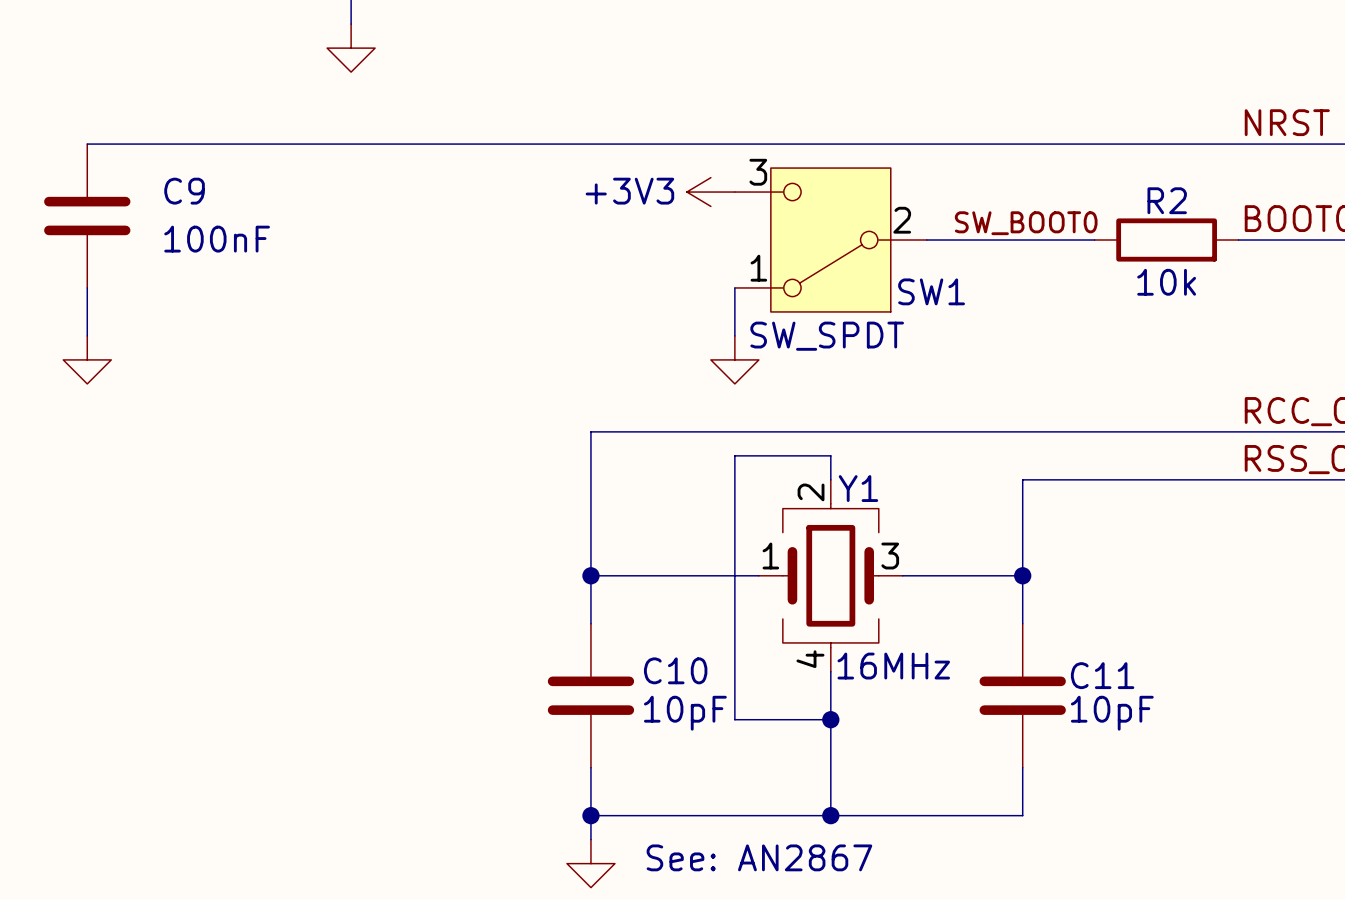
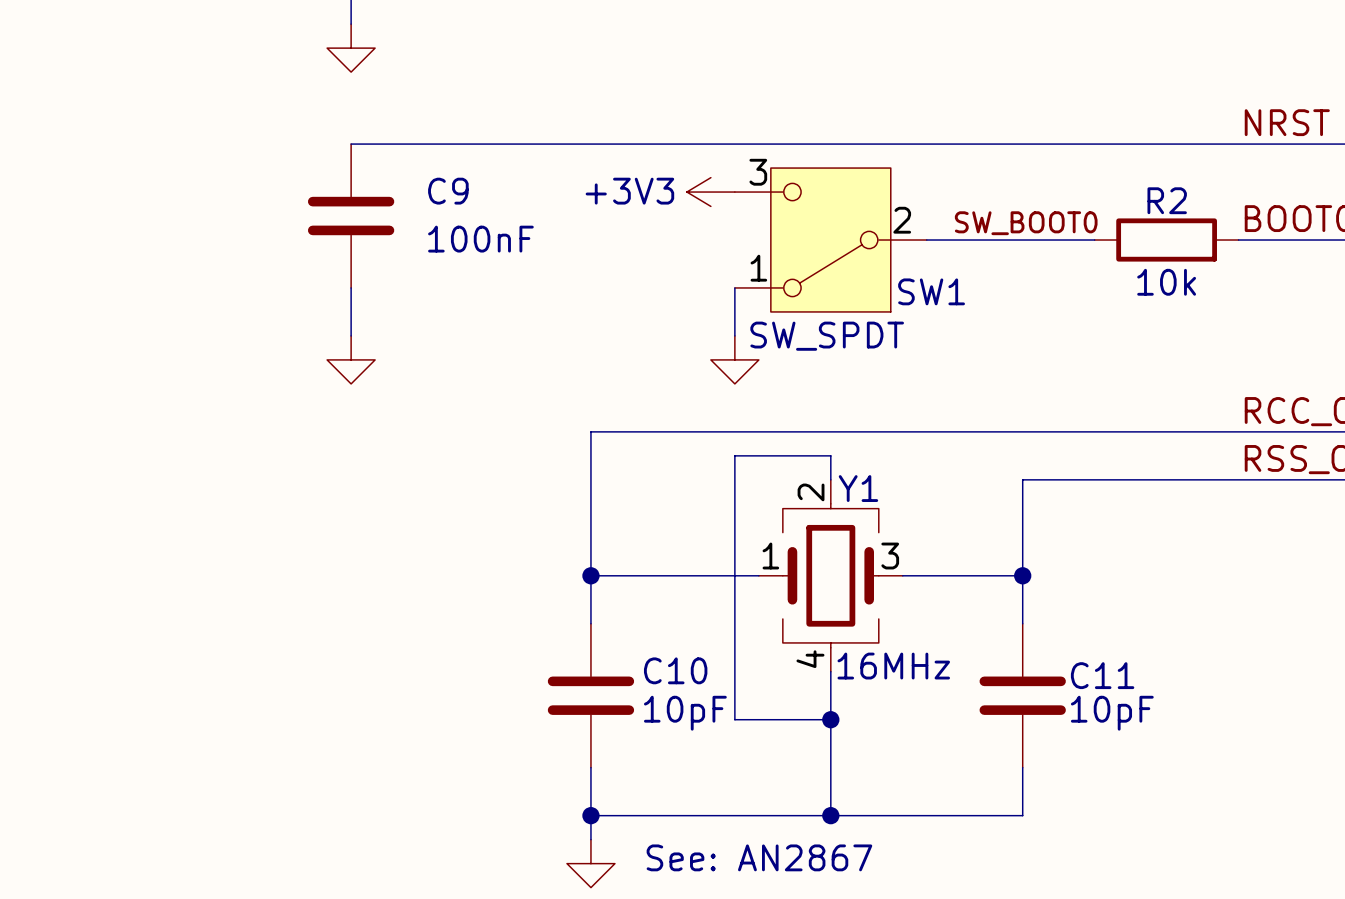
wire: (87, 144) (351, 144) -> none
C9 position: (87, 216) -> (351, 216)
wire: (87, 287) (87, 335) -> (351, 287) (351, 335)
power symbol position: (87, 359) -> (351, 359)

